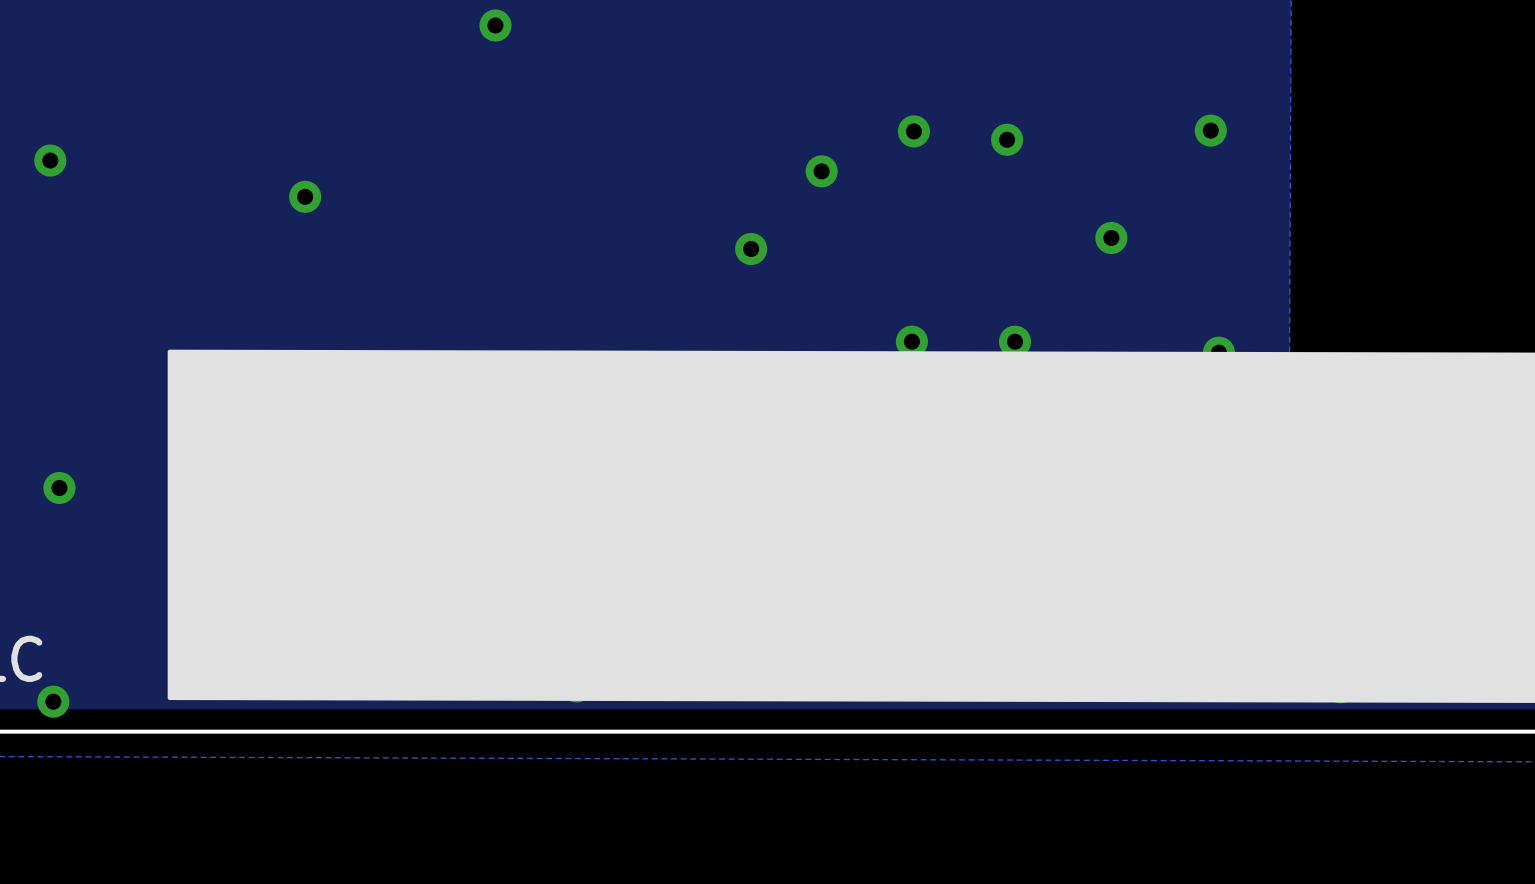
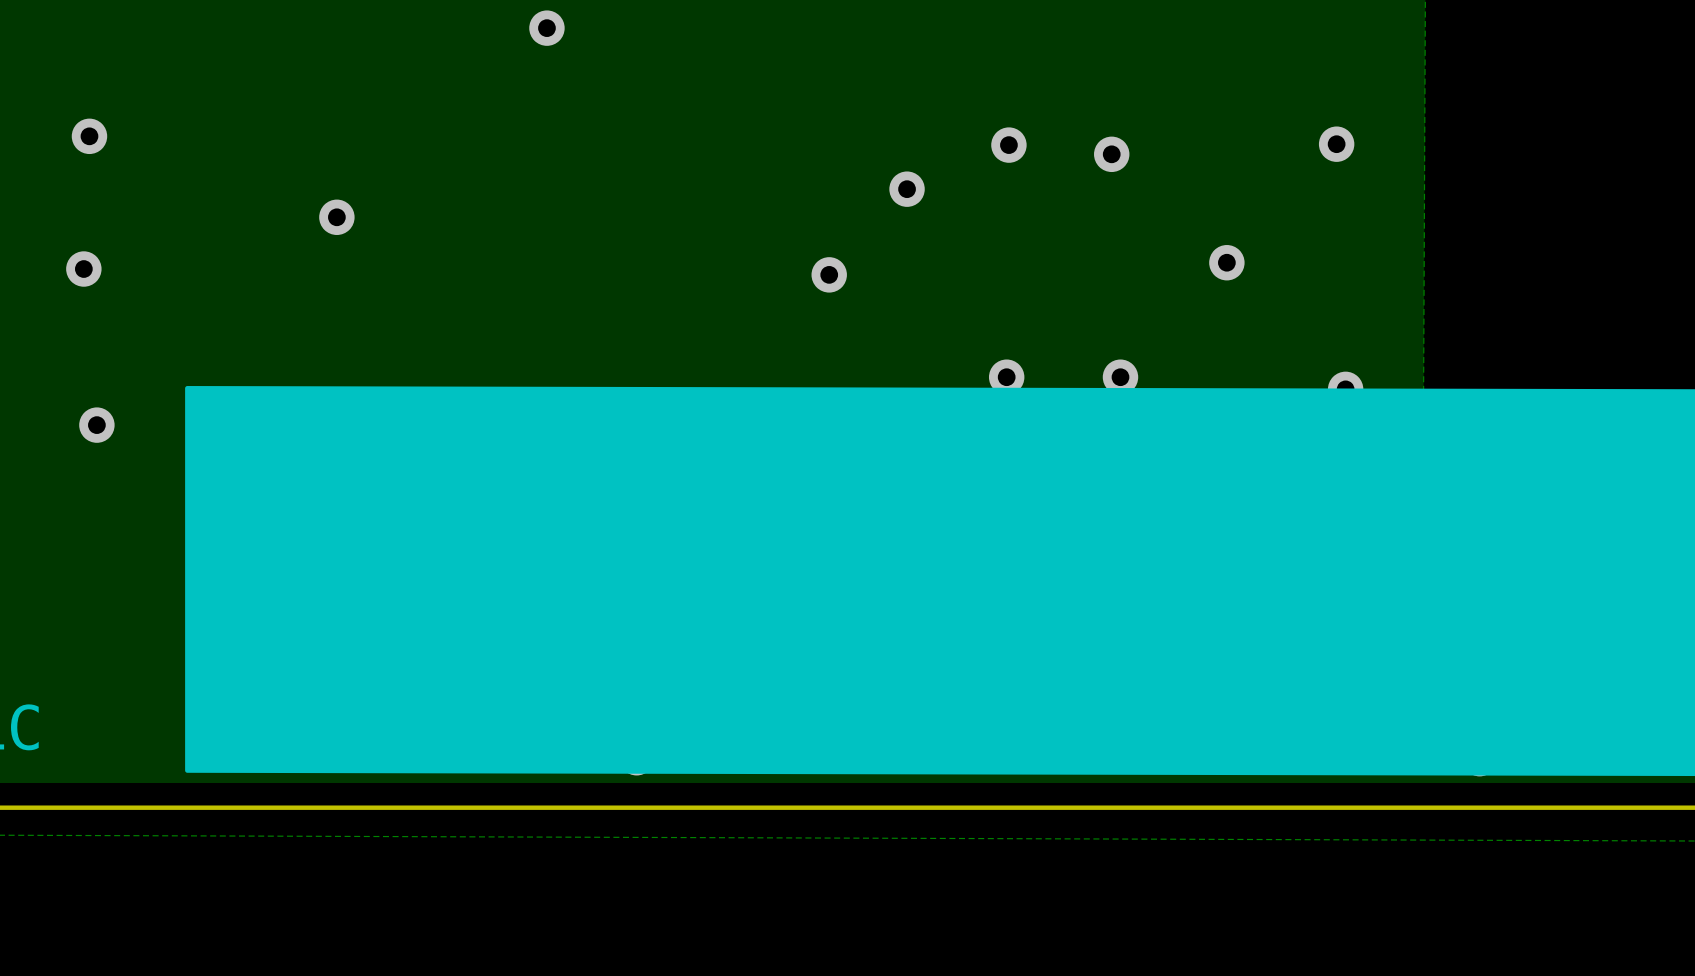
via: none -> (89, 136)
via: (50, 160) -> none
via: none -> (83, 269)
via: none -> (96, 425)
via: (59, 487) -> none
via: (53, 701) -> none

